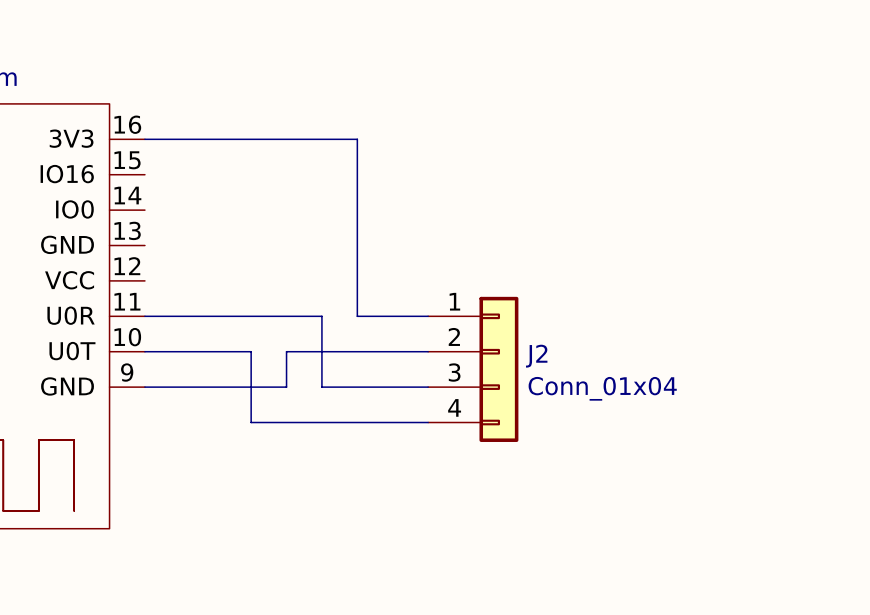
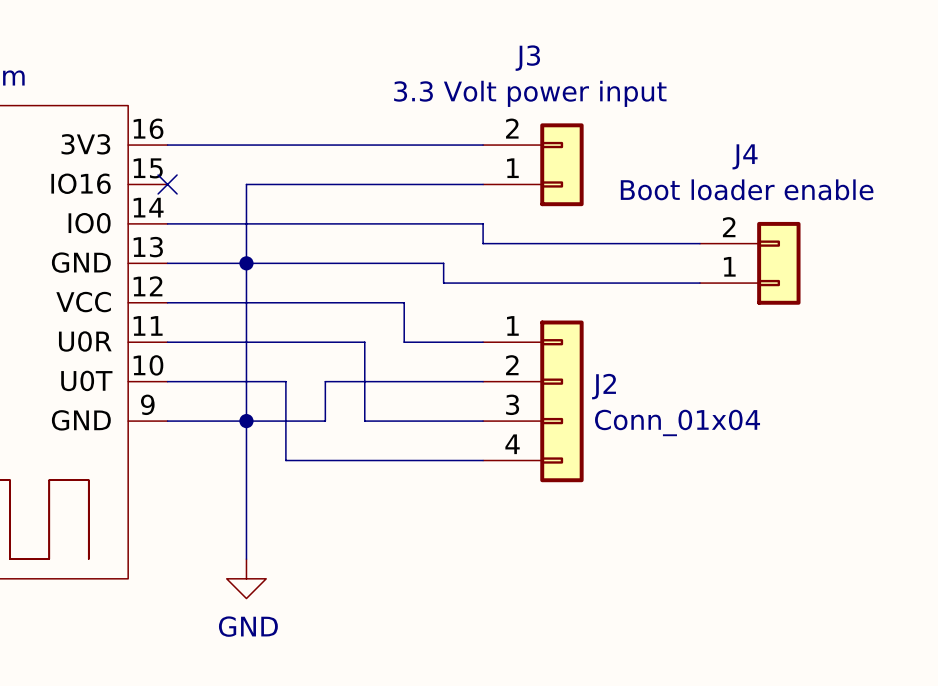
wire: (357, 139) (357, 280) -> (404, 145) (483, 145)
J3: none -> 3.3 Volt power input (533, 164)
no-connect mark: none -> (167, 184)
wire: none -> (483, 184) (246, 184) (246, 559)
wire: none -> (167, 223) (483, 223) (483, 243) (699, 243)
wire: none -> (167, 263) (443, 263) (443, 283) (699, 283)
junction: none -> (246, 263)
J4: none -> Boot loader enable (750, 263)
wire: none -> (167, 302) (404, 302)
junction: none -> (246, 421)
power symbol: none -> GND (246, 578)

